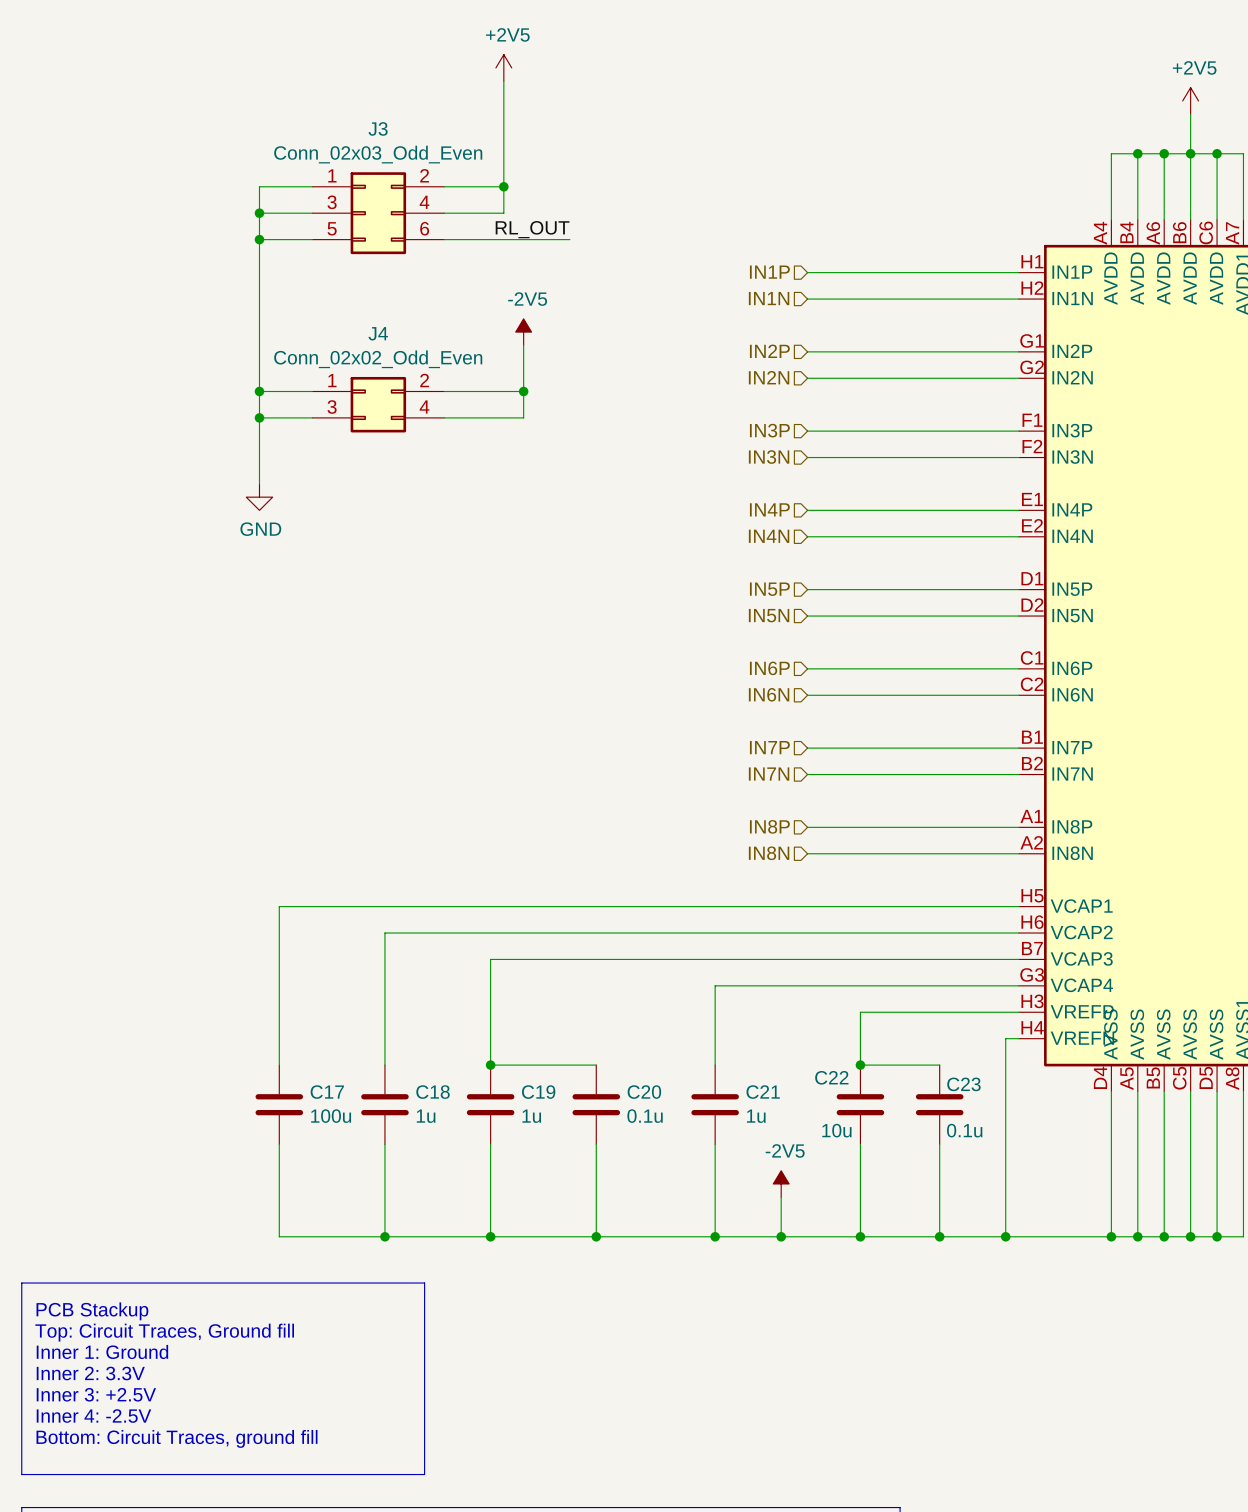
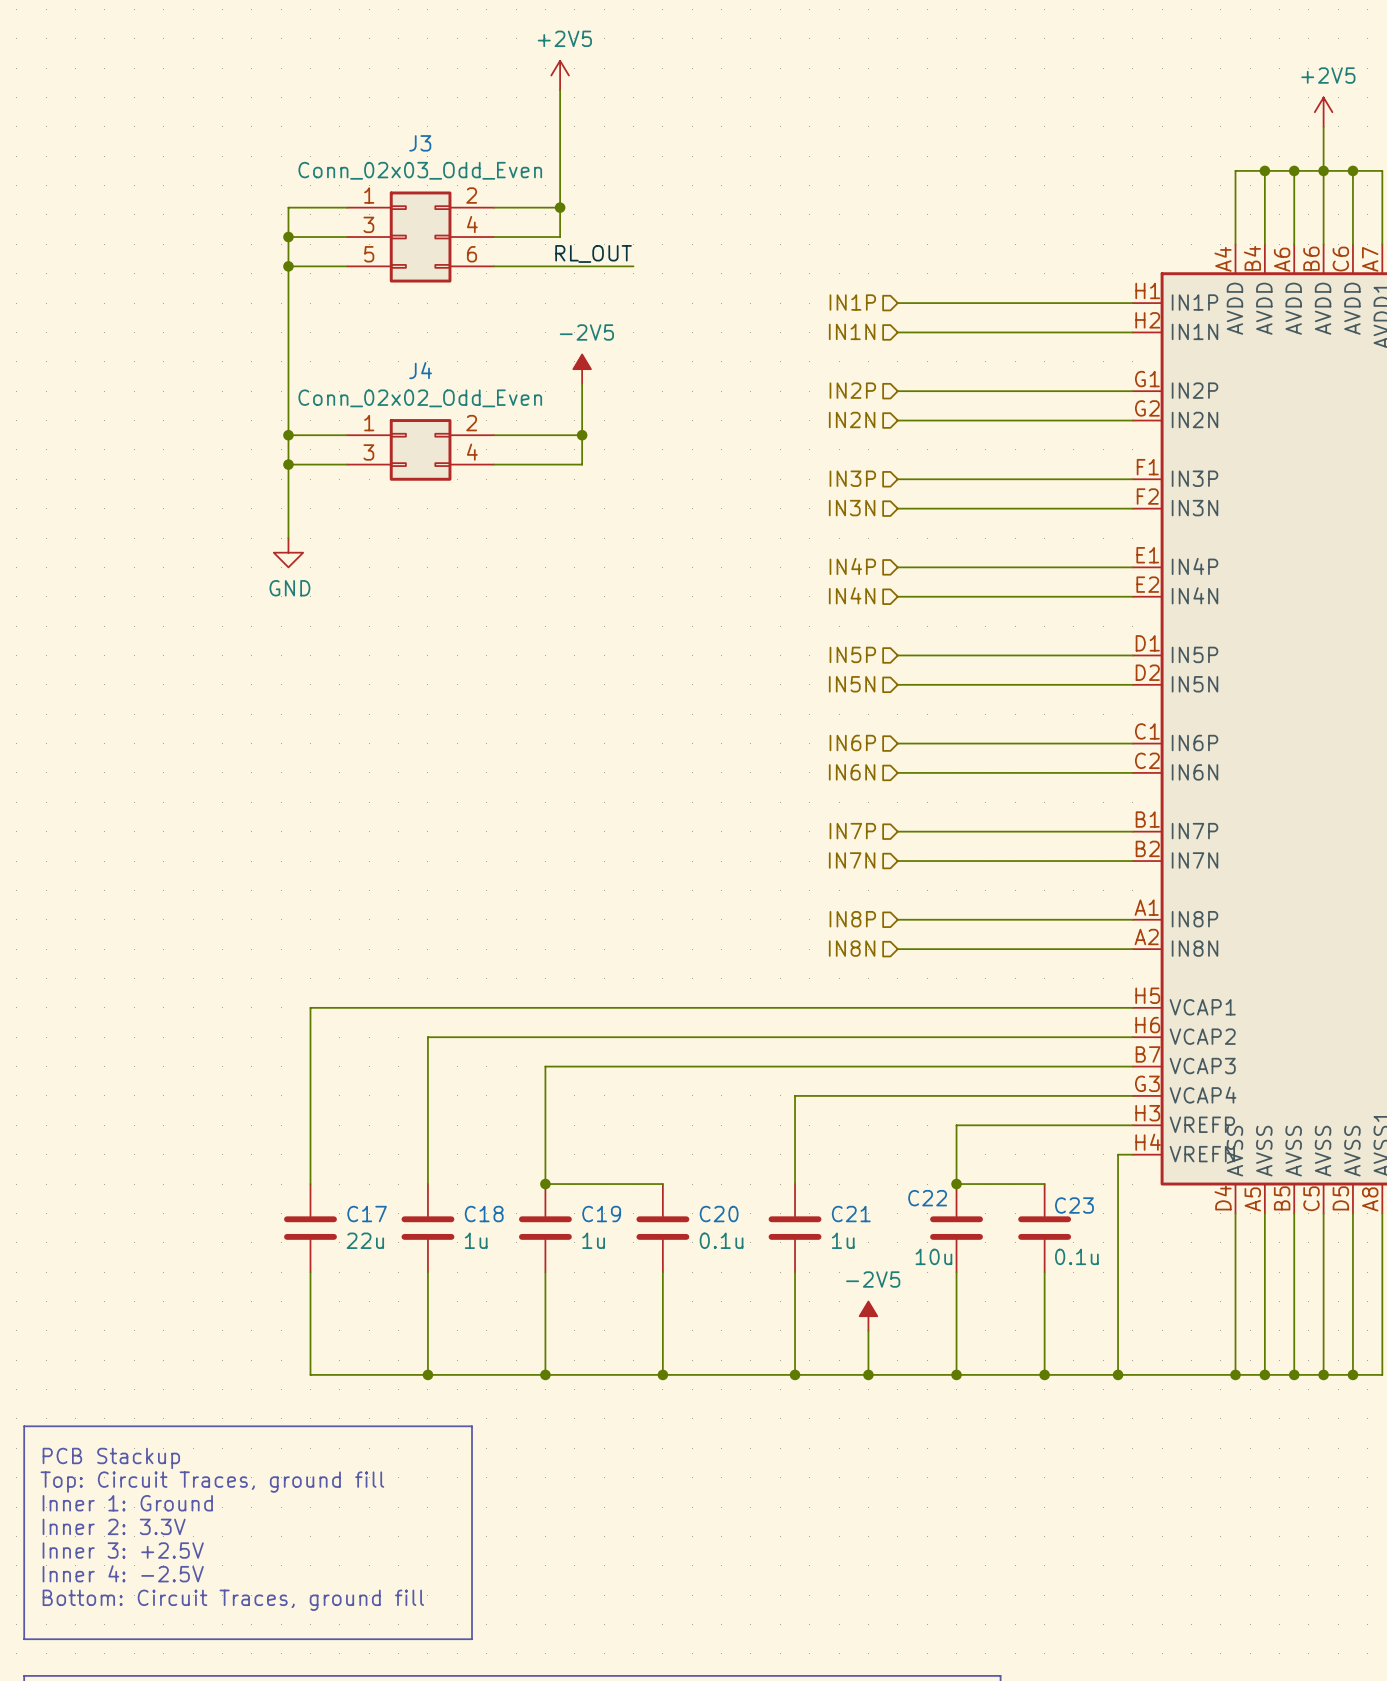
C17 value: 100u (331, 1116) -> 22u (365, 1240)
text: Top: Circuit Traces, Ground fill (164, 1332) -> Top: Circuit Traces, ground fill (212, 1482)

